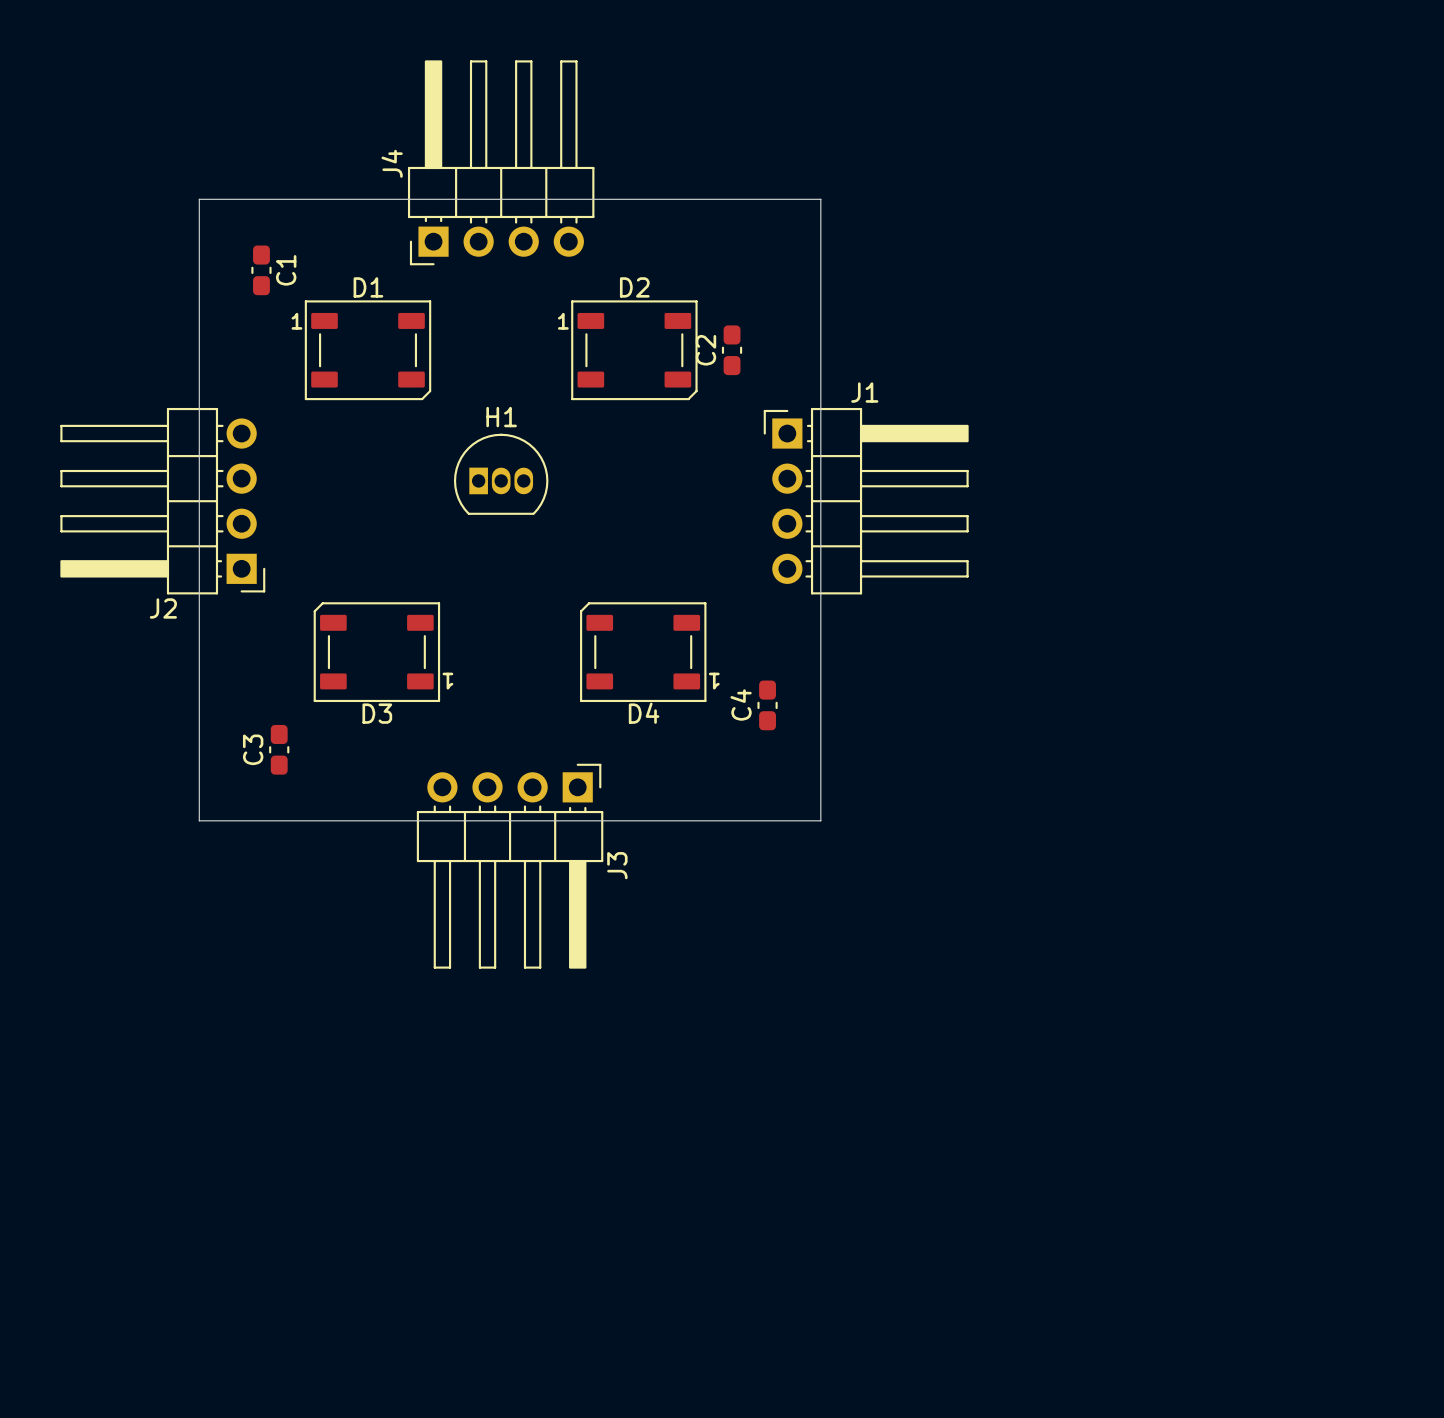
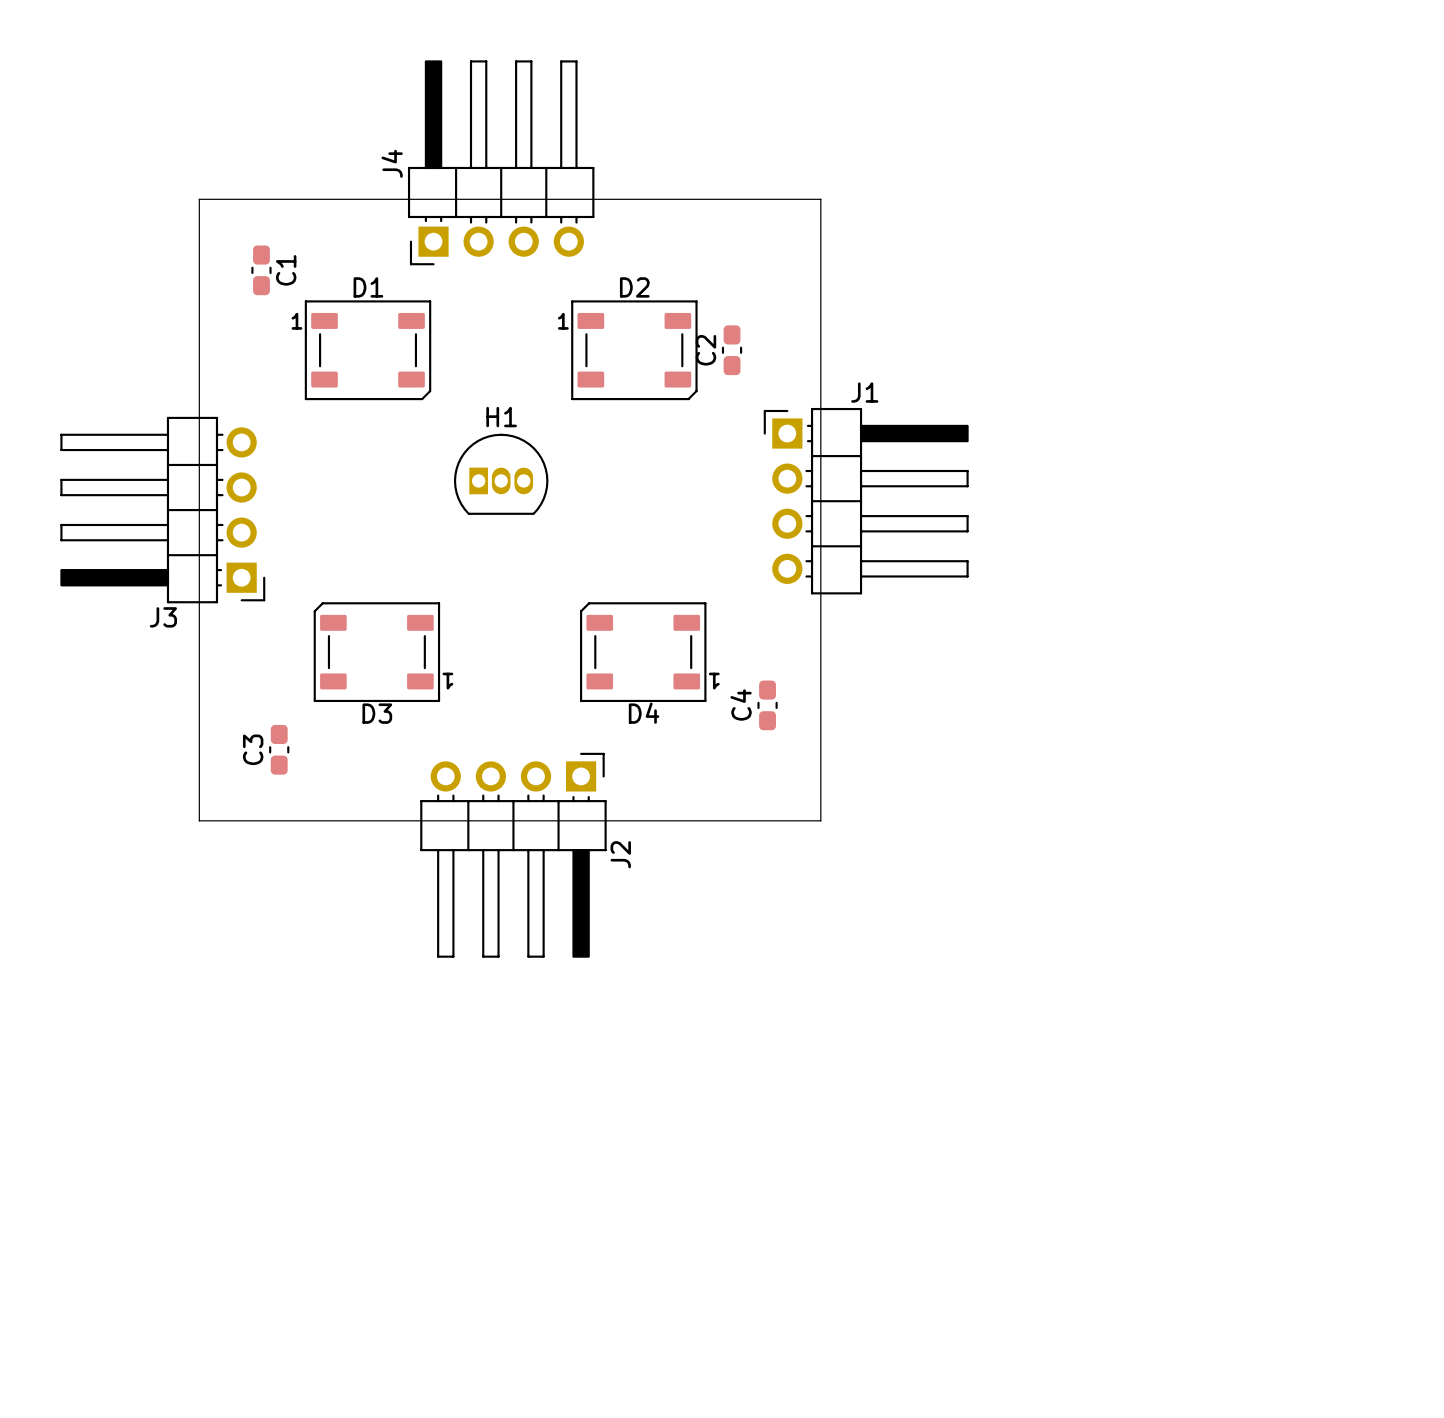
J2 rotation: 0° (162, 501) -> 90° counterclockwise (513, 855)
J2 position: (162, 501) -> (513, 855)
J3 rotation: 0° (510, 866) -> 90° clockwise (162, 510)
J3 position: (510, 866) -> (162, 510)

